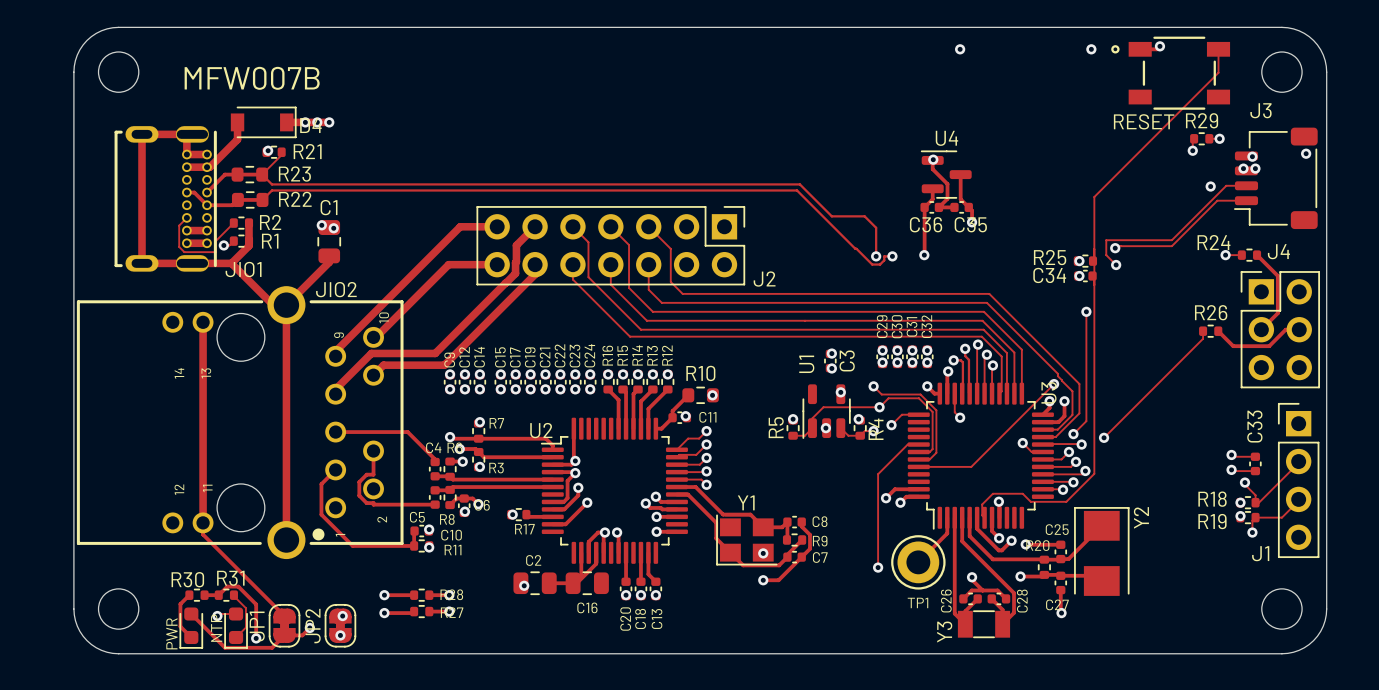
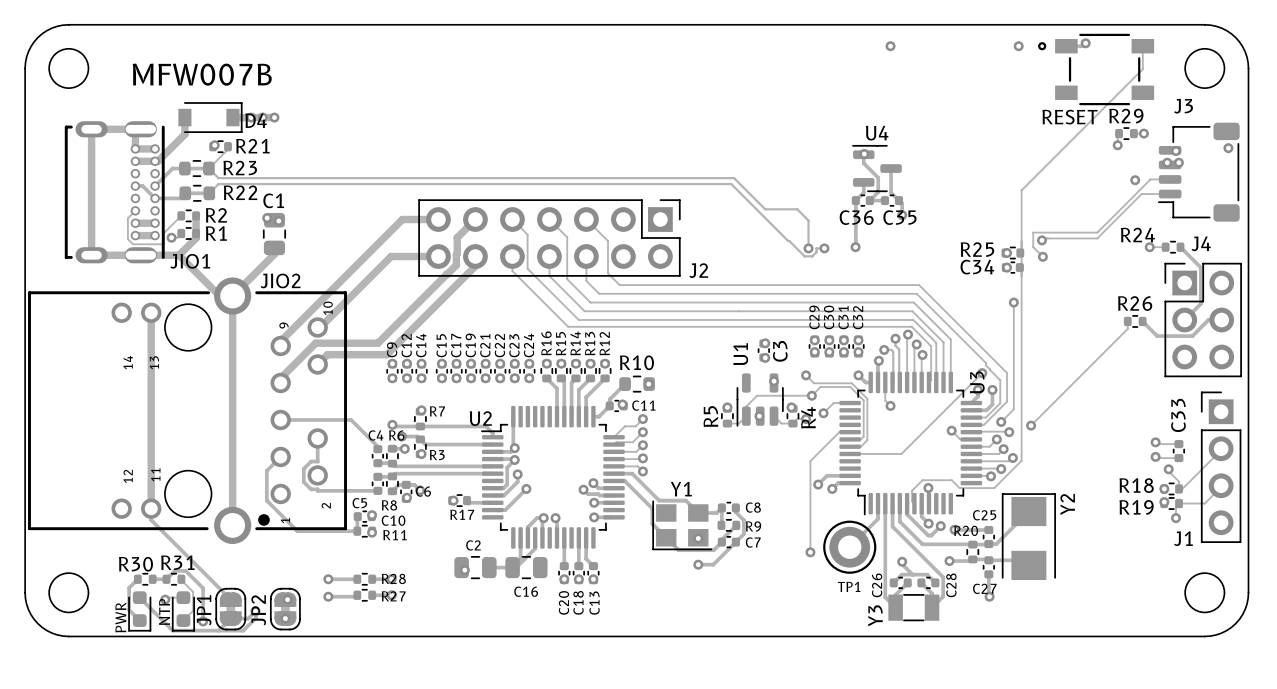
track: (225, 647) (272, 647) -> (172, 630) (243, 630) (255, 617) (255, 609)

